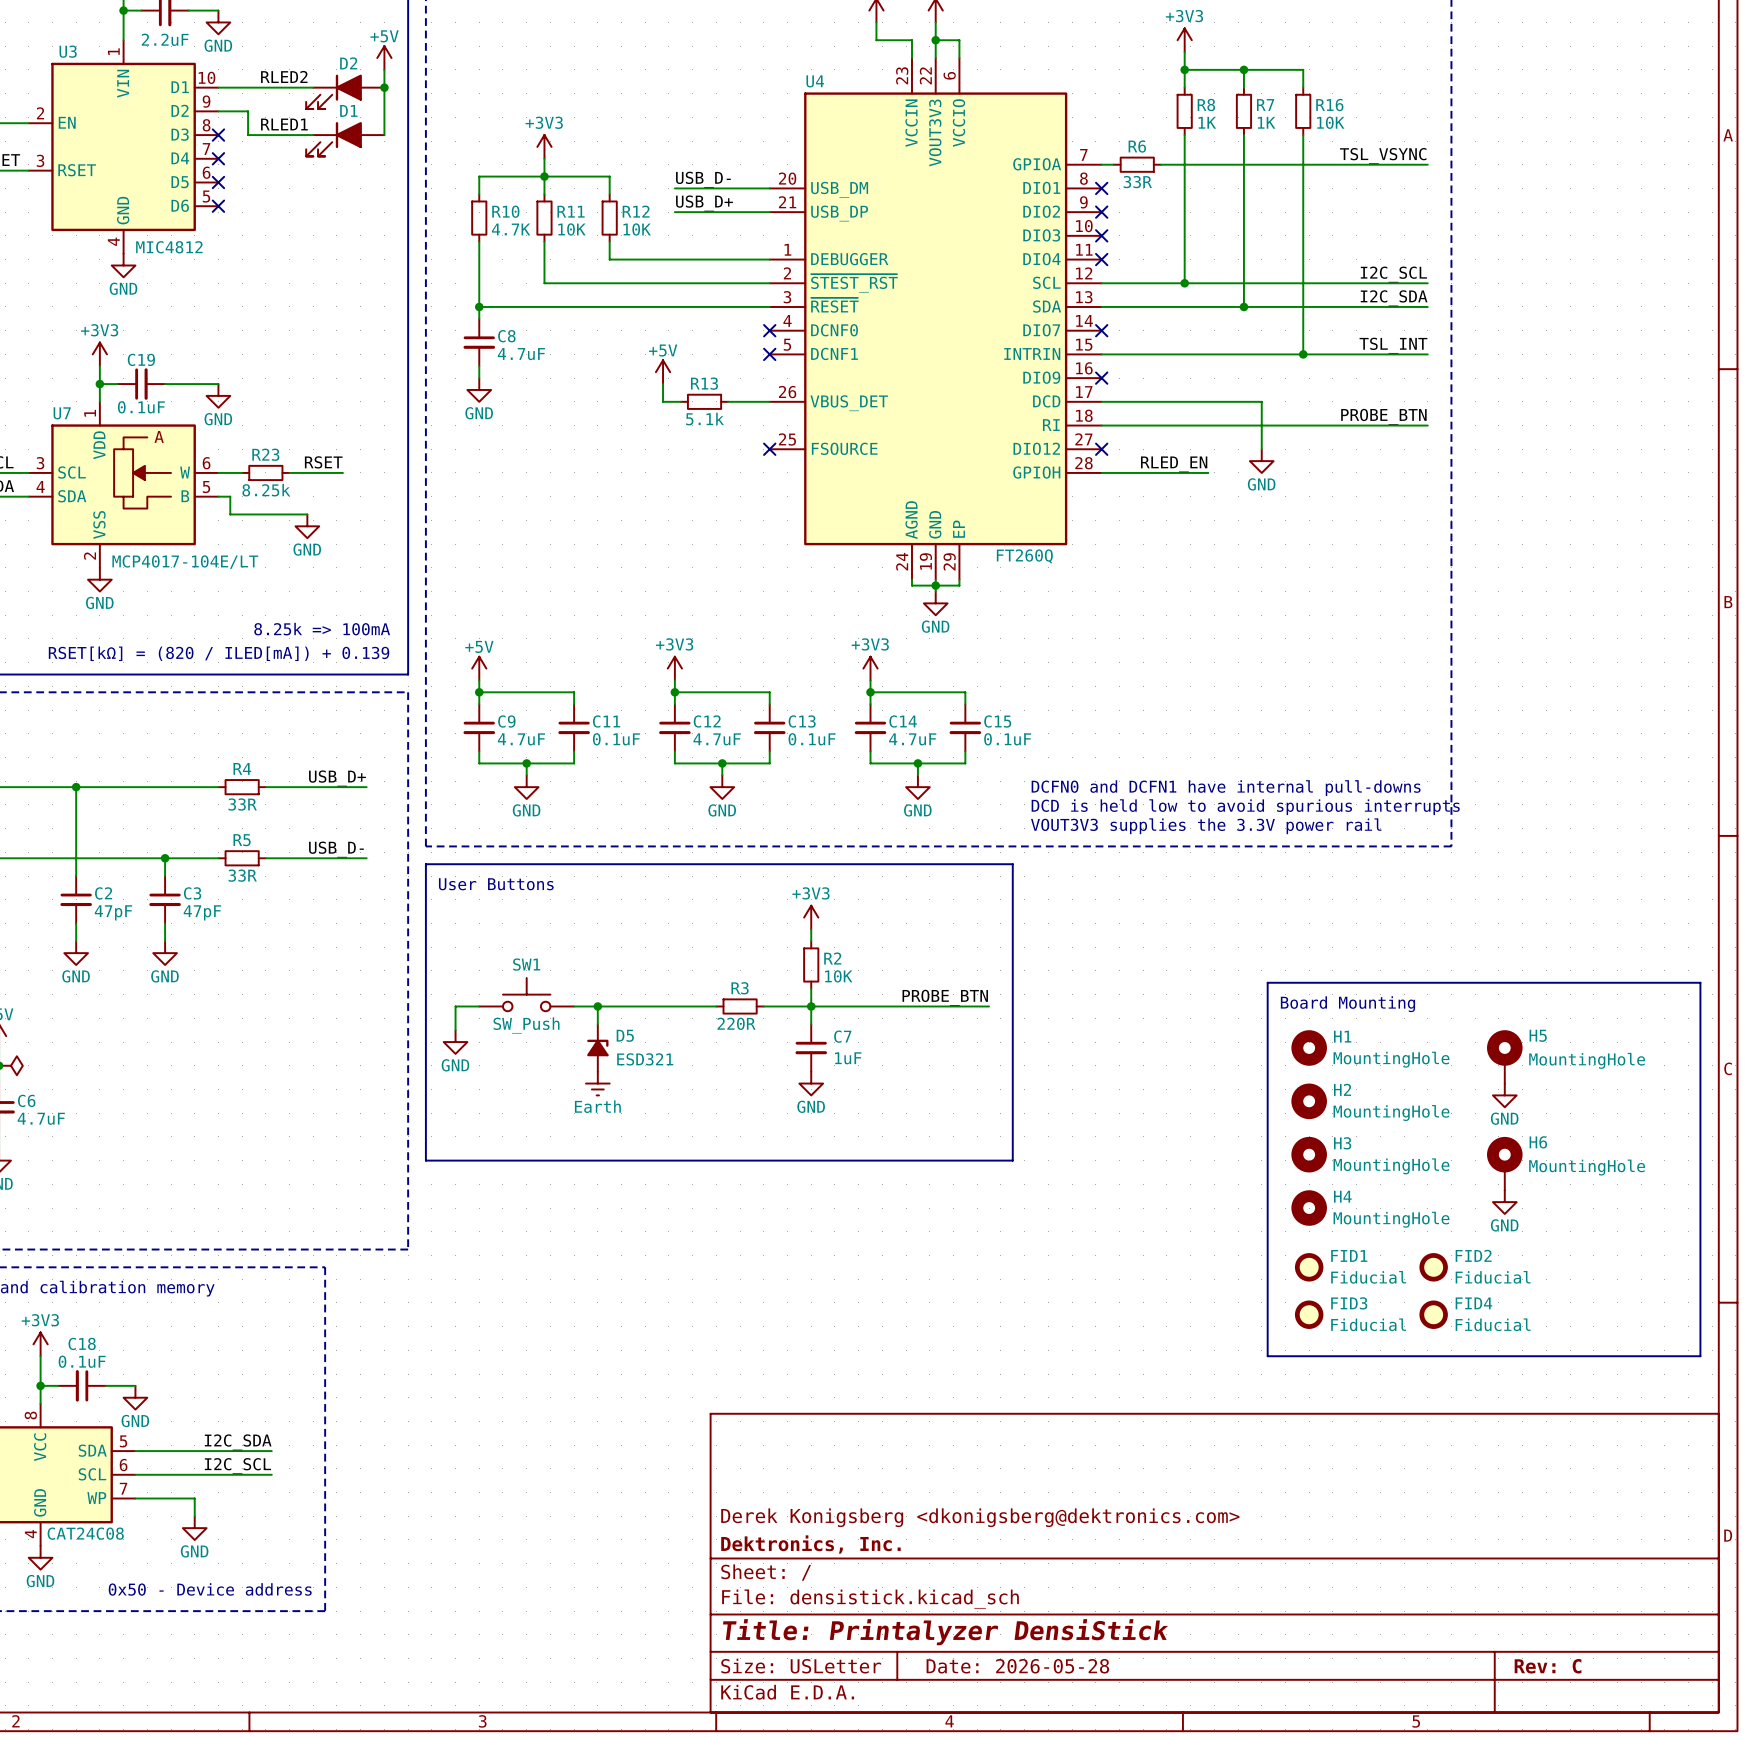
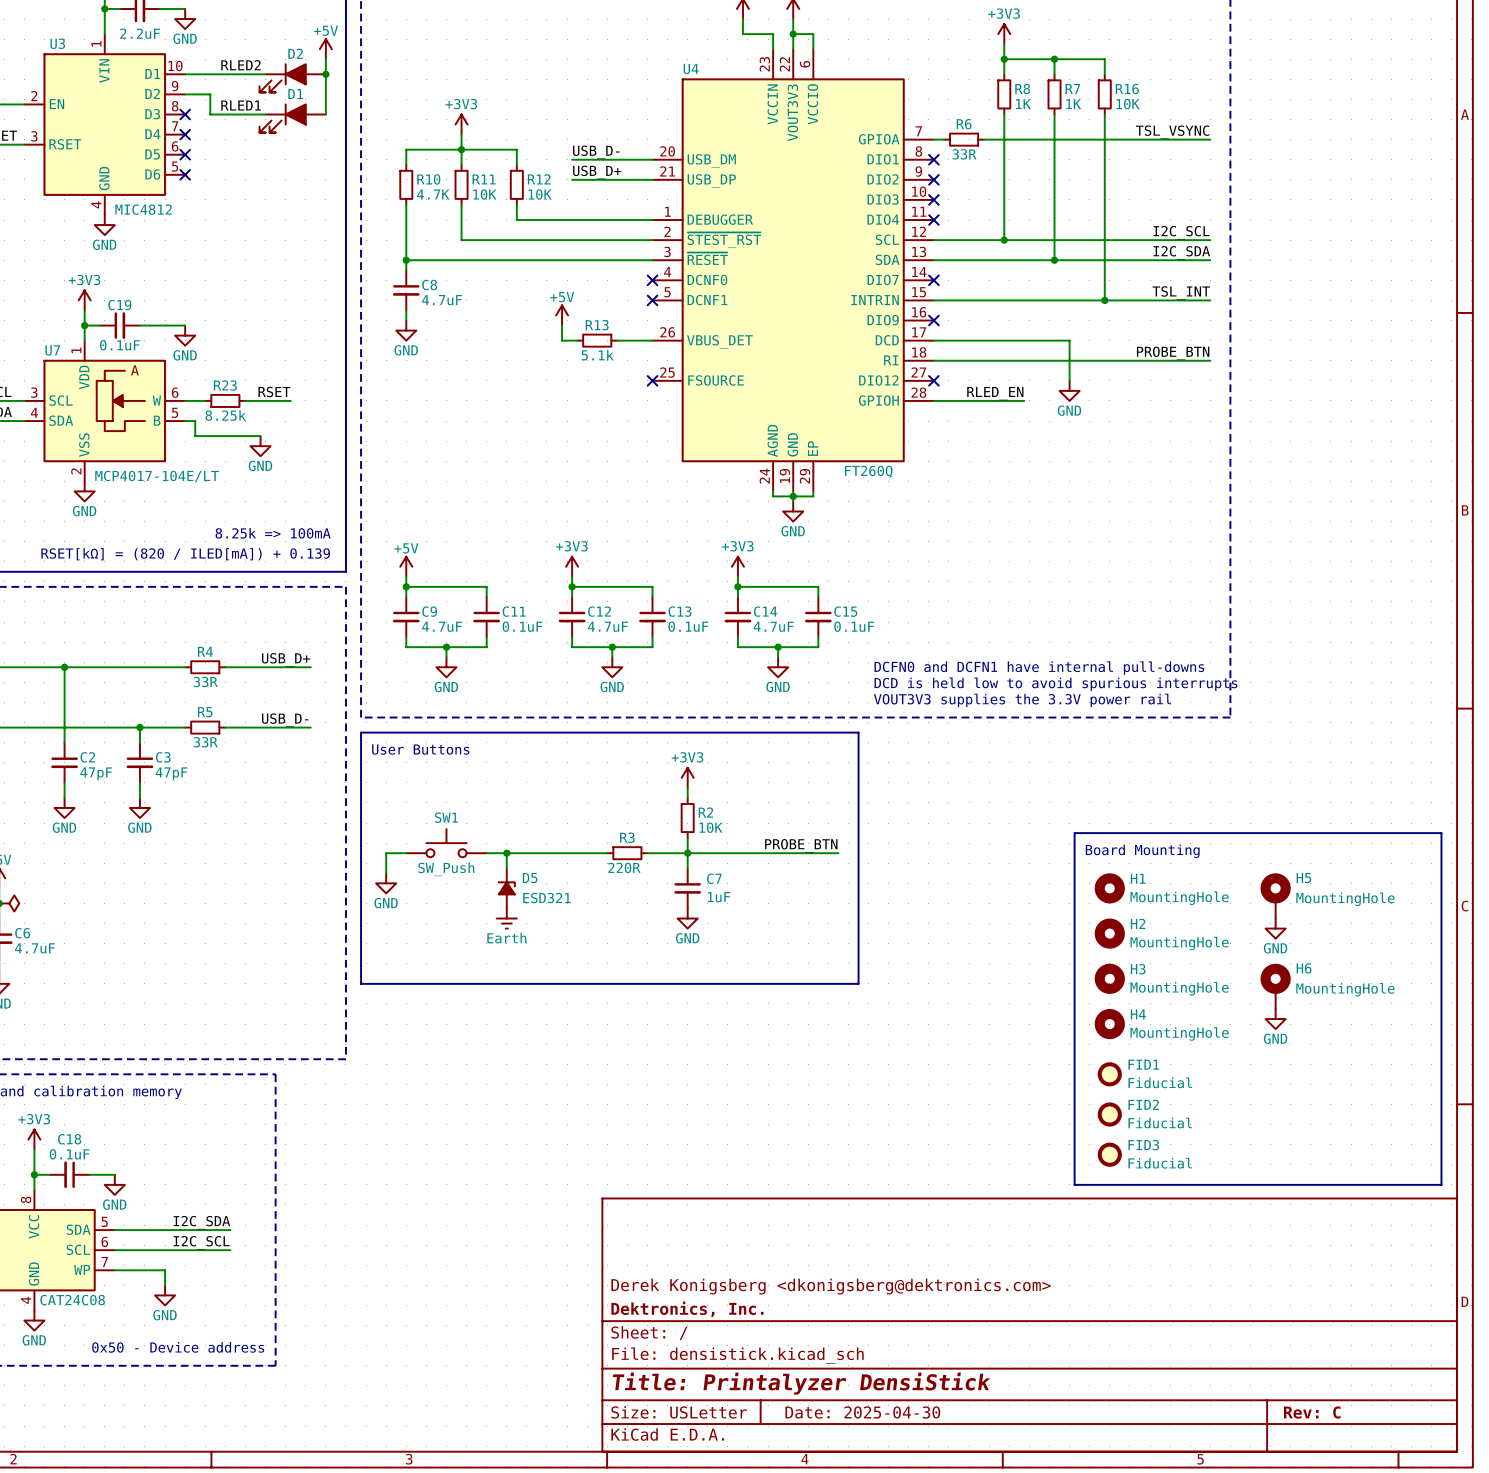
FID2: Fiducial (1433, 1267) -> none
FID3 name: FID3 (1349, 1303) -> FID2 (1143, 1104)
FID4: Fiducial (1433, 1314) -> none
line: (1267, 1356) (1700, 1356) -> (1074, 1149) (1074, 1184) (1441, 1184) (1441, 1149)
FID3: none -> Fiducial (1109, 1154)
title block: Date: 2026-05-28 (1017, 1666) -> Date: 2025-04-30 (862, 1412)

